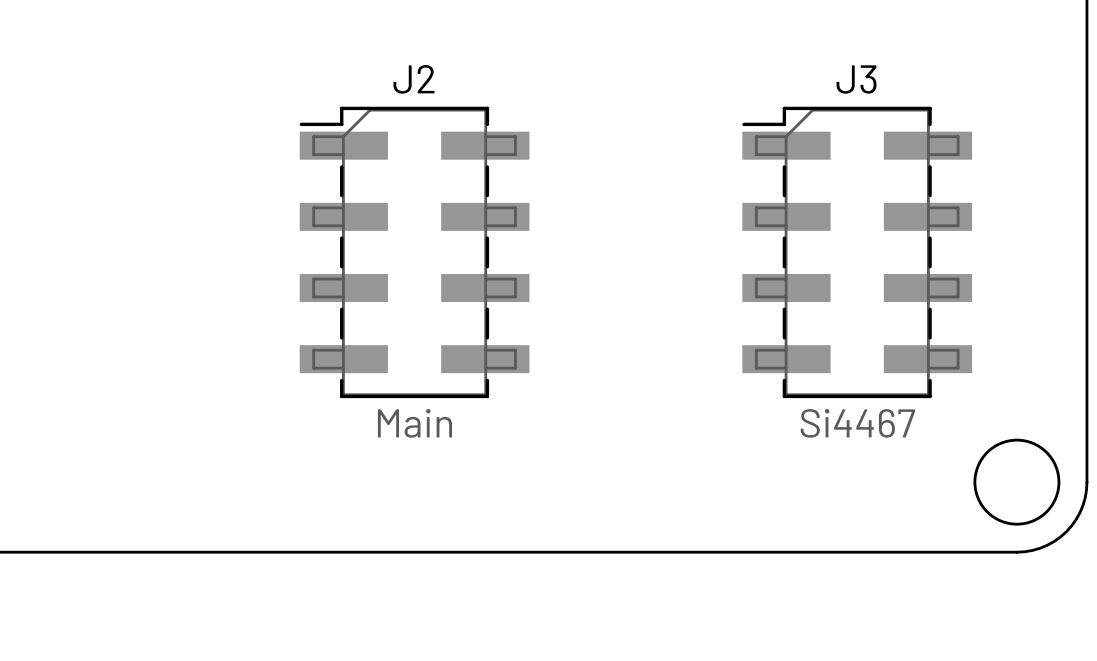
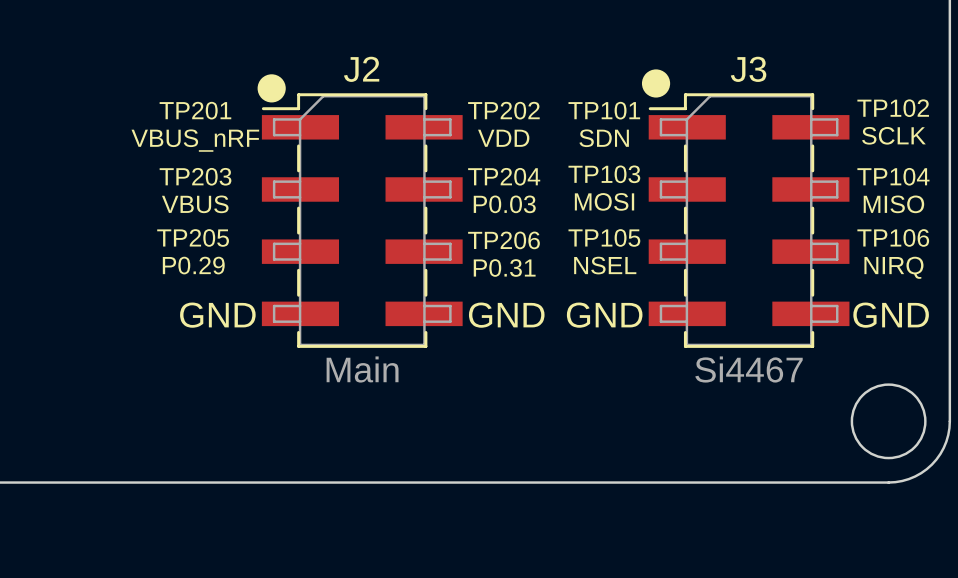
drawing: none -> [641, 69, 671, 98]
drawing: none -> [257, 74, 286, 103]
text: none -> TP102 (893, 108)
text: none -> TP201 (195, 110)
text: none -> TP202 (503, 110)
text: none -> TP101 (604, 110)
text: none -> SCLK (893, 135)
text: none -> VBUS_nRF (195, 140)
text: none -> VDD (503, 138)
text: none -> SDN (604, 138)
text: none -> TP103 (604, 174)
text: none -> TP203 (195, 176)
text: none -> TP204 (504, 176)
text: none -> TP104 (893, 176)
text: none -> MOSI (604, 201)
text: none -> VBUS (195, 204)
text: none -> P0.03 (504, 204)
text: none -> MISO (893, 204)
text: none -> TP205 (193, 237)
text: none -> TP105 (604, 237)
text: none -> TP106 (893, 237)
text: none -> TP206 (503, 240)
text: none -> P0.29 (193, 265)
text: none -> NSEL (605, 265)
text: none -> NIRQ (893, 267)
text: none -> P0.31 (504, 268)
text: none -> GND (217, 315)
text: none -> GND (506, 315)
text: none -> GND (604, 315)
text: none -> GND (891, 315)

